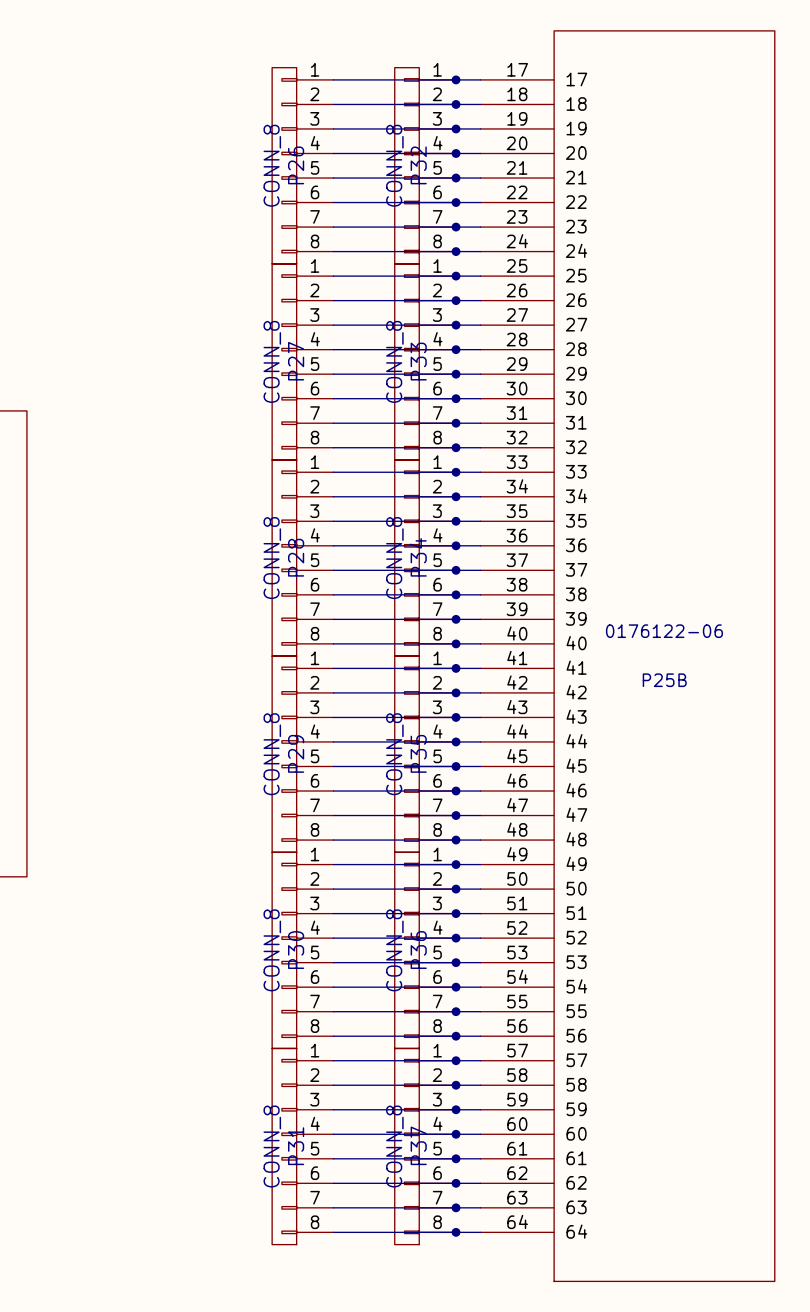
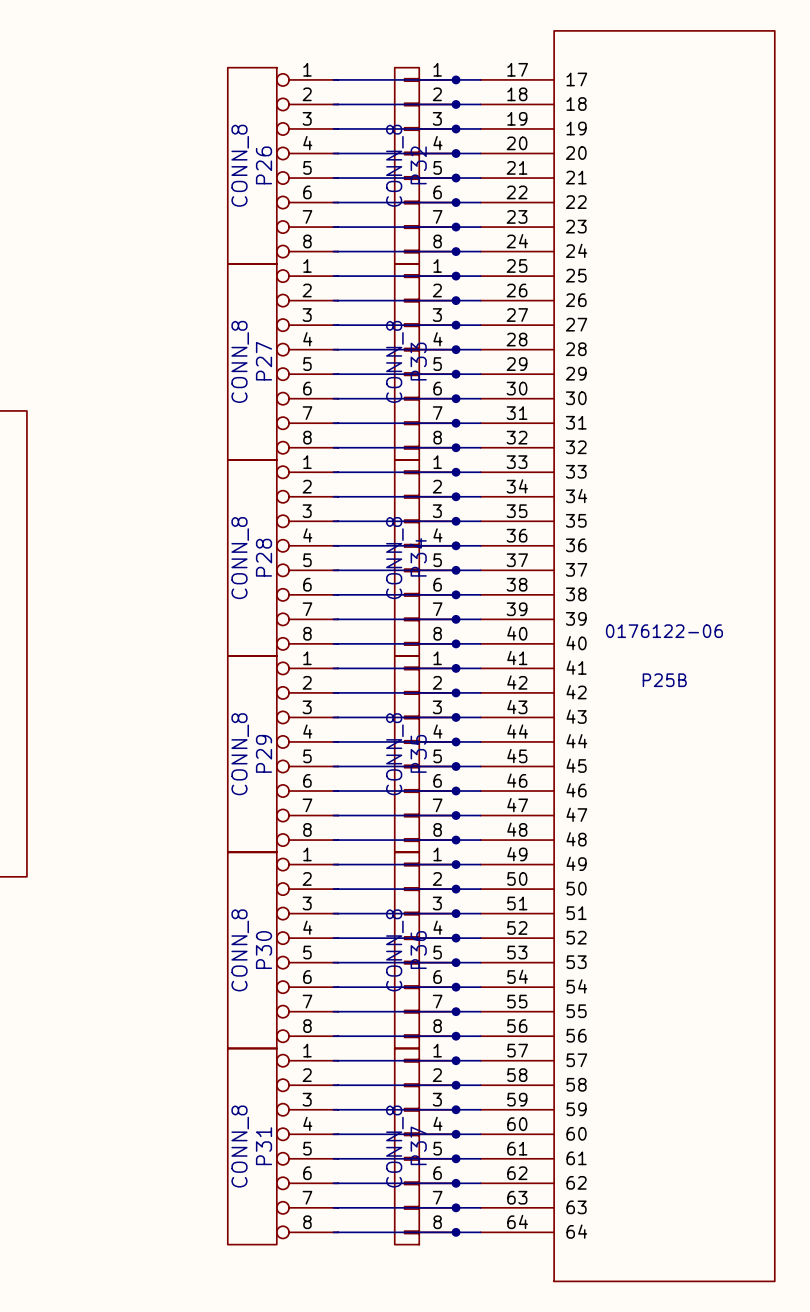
P26 symbol: [272, 67, 334, 264] -> [227, 67, 339, 264]
P27 symbol: [272, 263, 334, 460] -> [227, 263, 339, 460]
P28 symbol: [272, 459, 334, 657] -> [227, 459, 339, 657]
P29 symbol: [272, 656, 334, 853] -> [227, 656, 339, 853]
P30 symbol: [272, 852, 334, 1049] -> [227, 852, 339, 1049]
P31 symbol: [272, 1048, 334, 1245] -> [227, 1048, 339, 1245]

